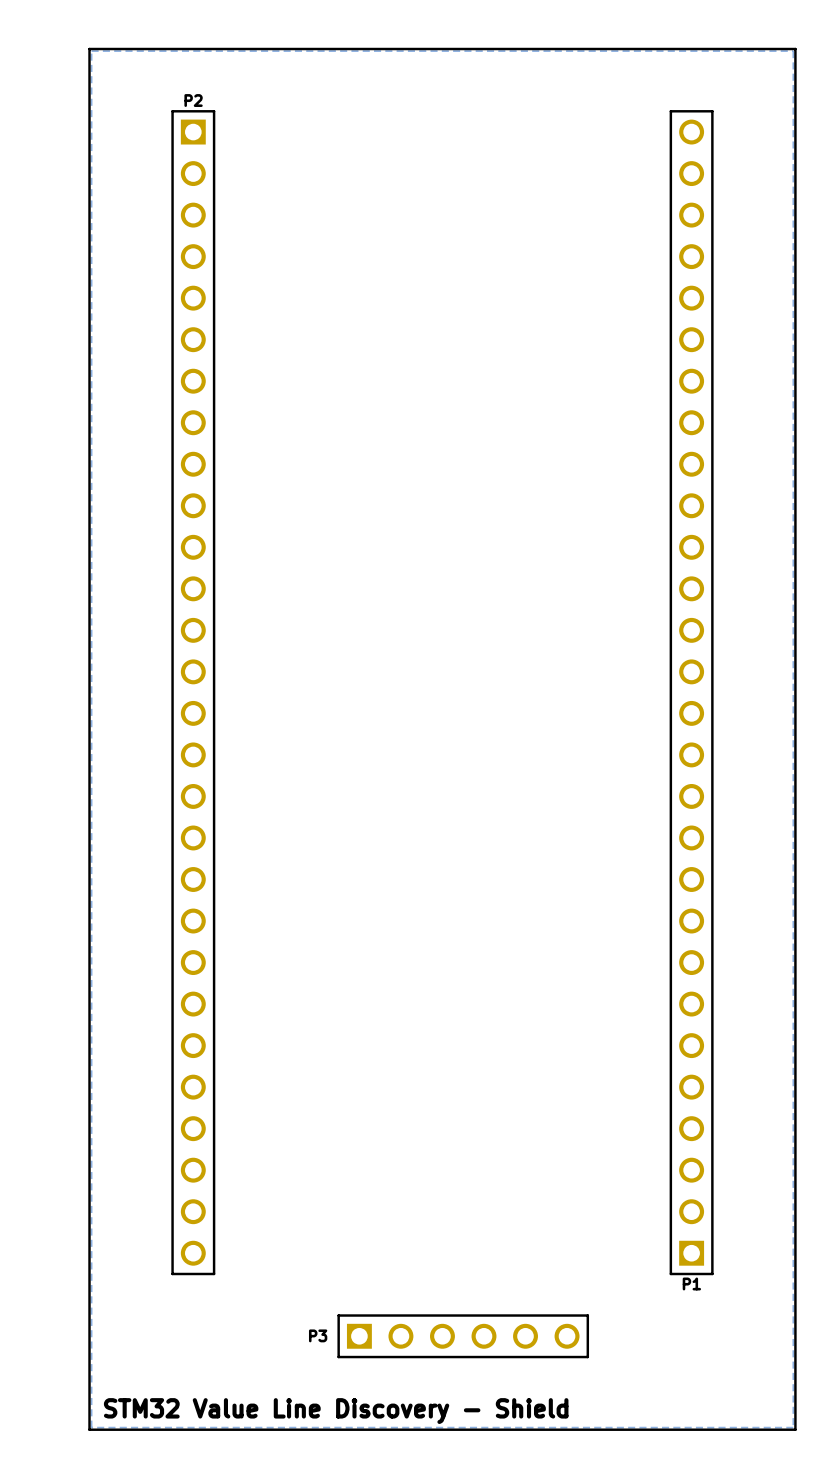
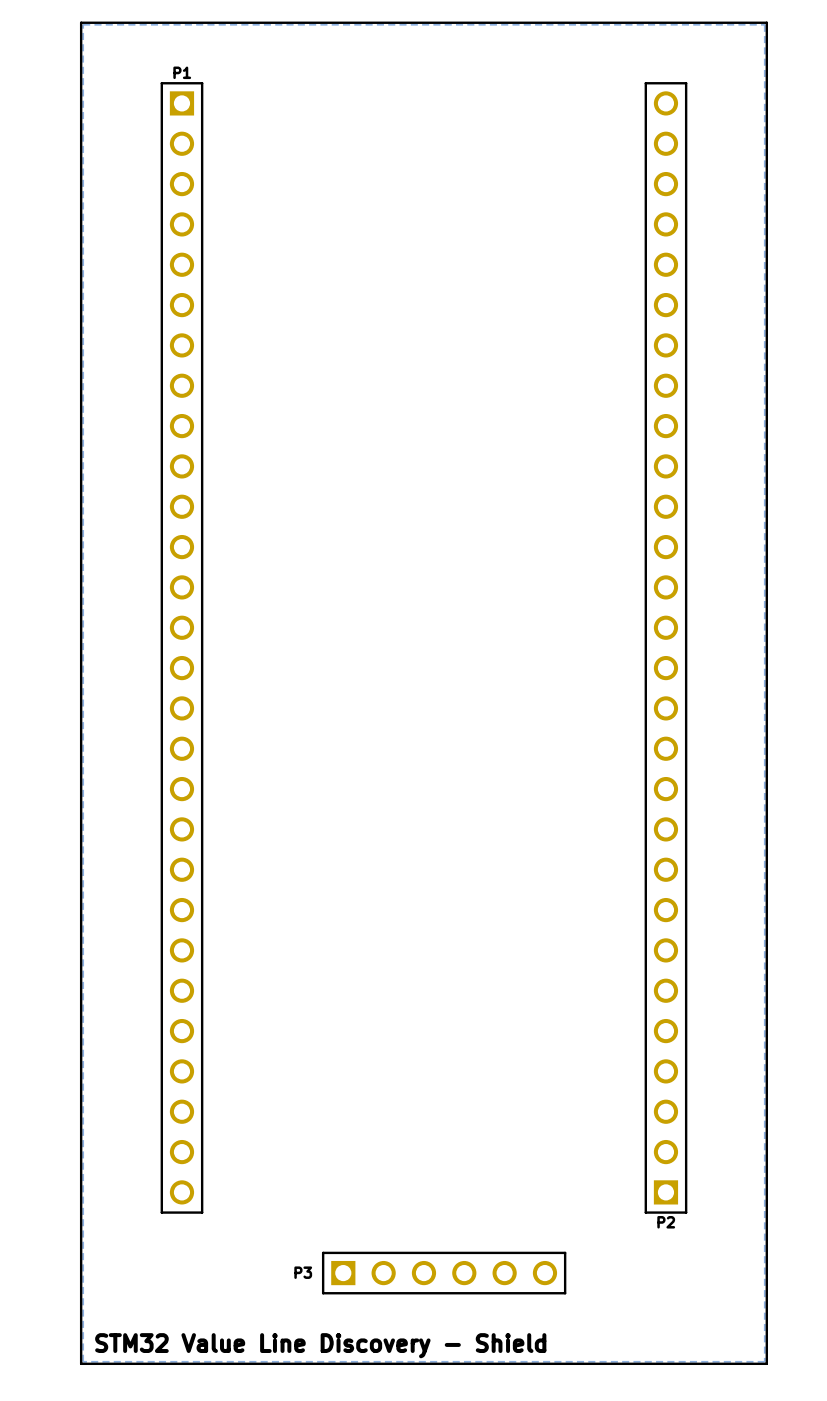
P2 name: P2 (193, 100) -> P1 (182, 72)
P1 name: P1 (691, 1283) -> P2 (666, 1222)

